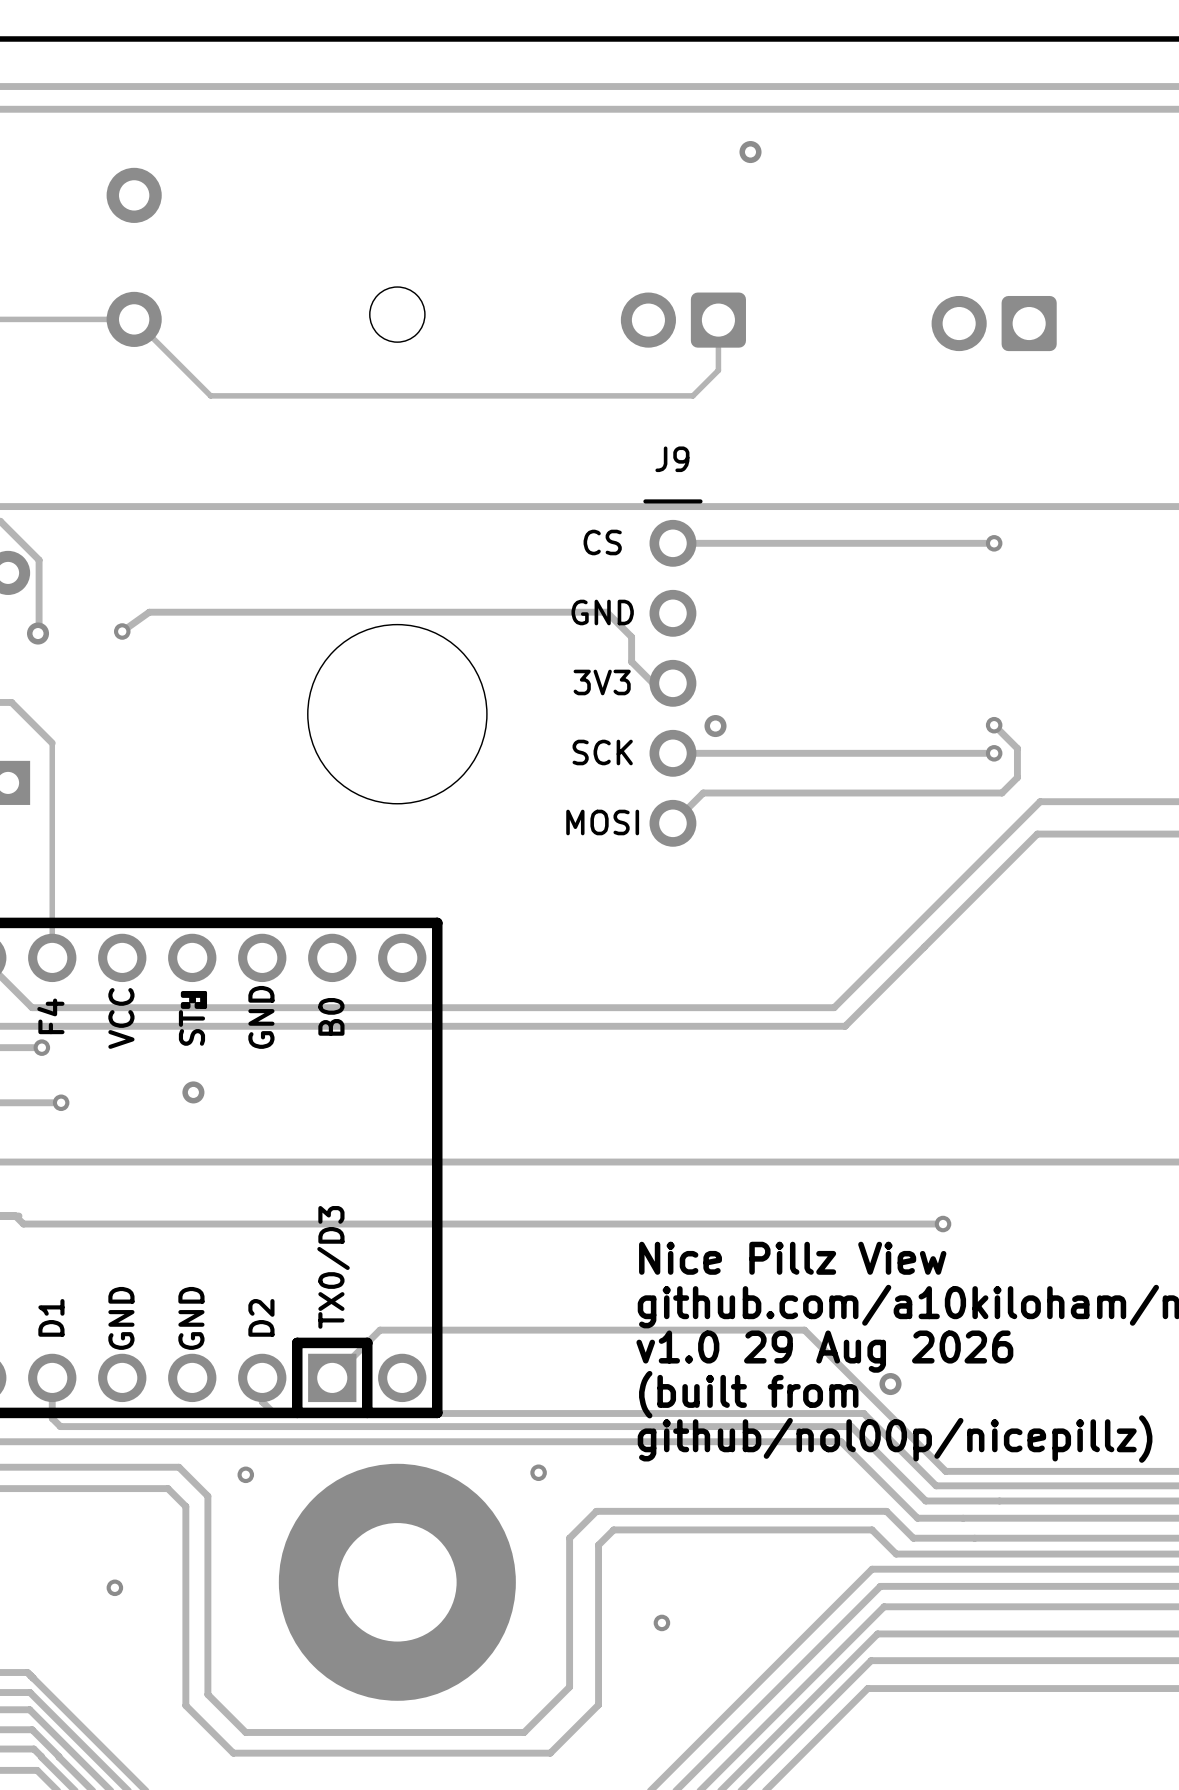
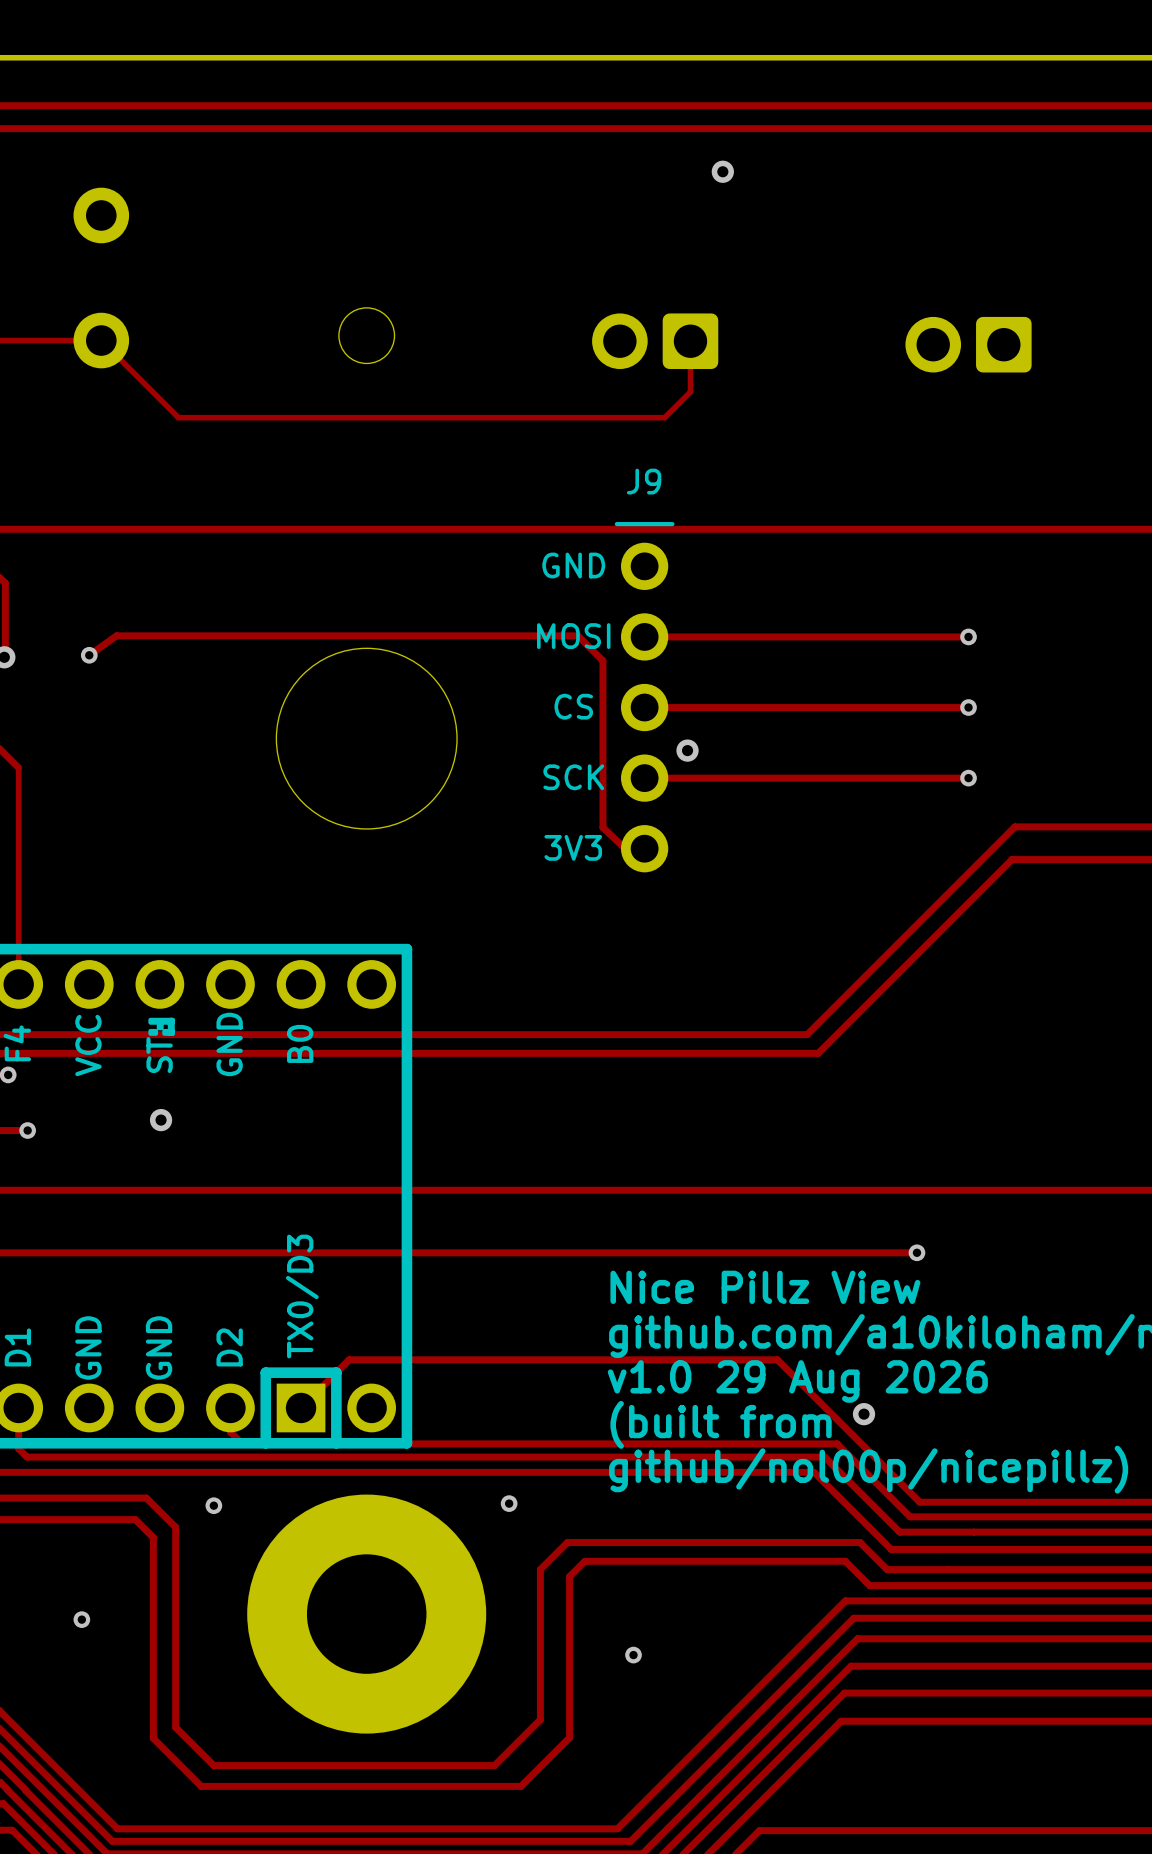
J9 text: CS (602, 542) -> GND (573, 565)
track: (672, 543) (994, 543) -> (644, 636) (968, 636)
via: (994, 543) -> none
J9 text: GND (602, 612) -> MOSI (573, 636)
via: none -> (968, 636)
track: (631, 661) (653, 683) (672, 683) -> (602, 685) (602, 827) (625, 848) (644, 848)
J9 text: 3V3 (602, 682) -> CS (573, 706)
track: none -> (644, 707) (968, 707)
track: (994, 725) (1017, 748) (1017, 777) (1002, 793) (703, 793) (672, 823) -> none
via position: (994, 725) -> (968, 707)
J9 text: MOSI (602, 822) -> 3V3 (573, 847)

